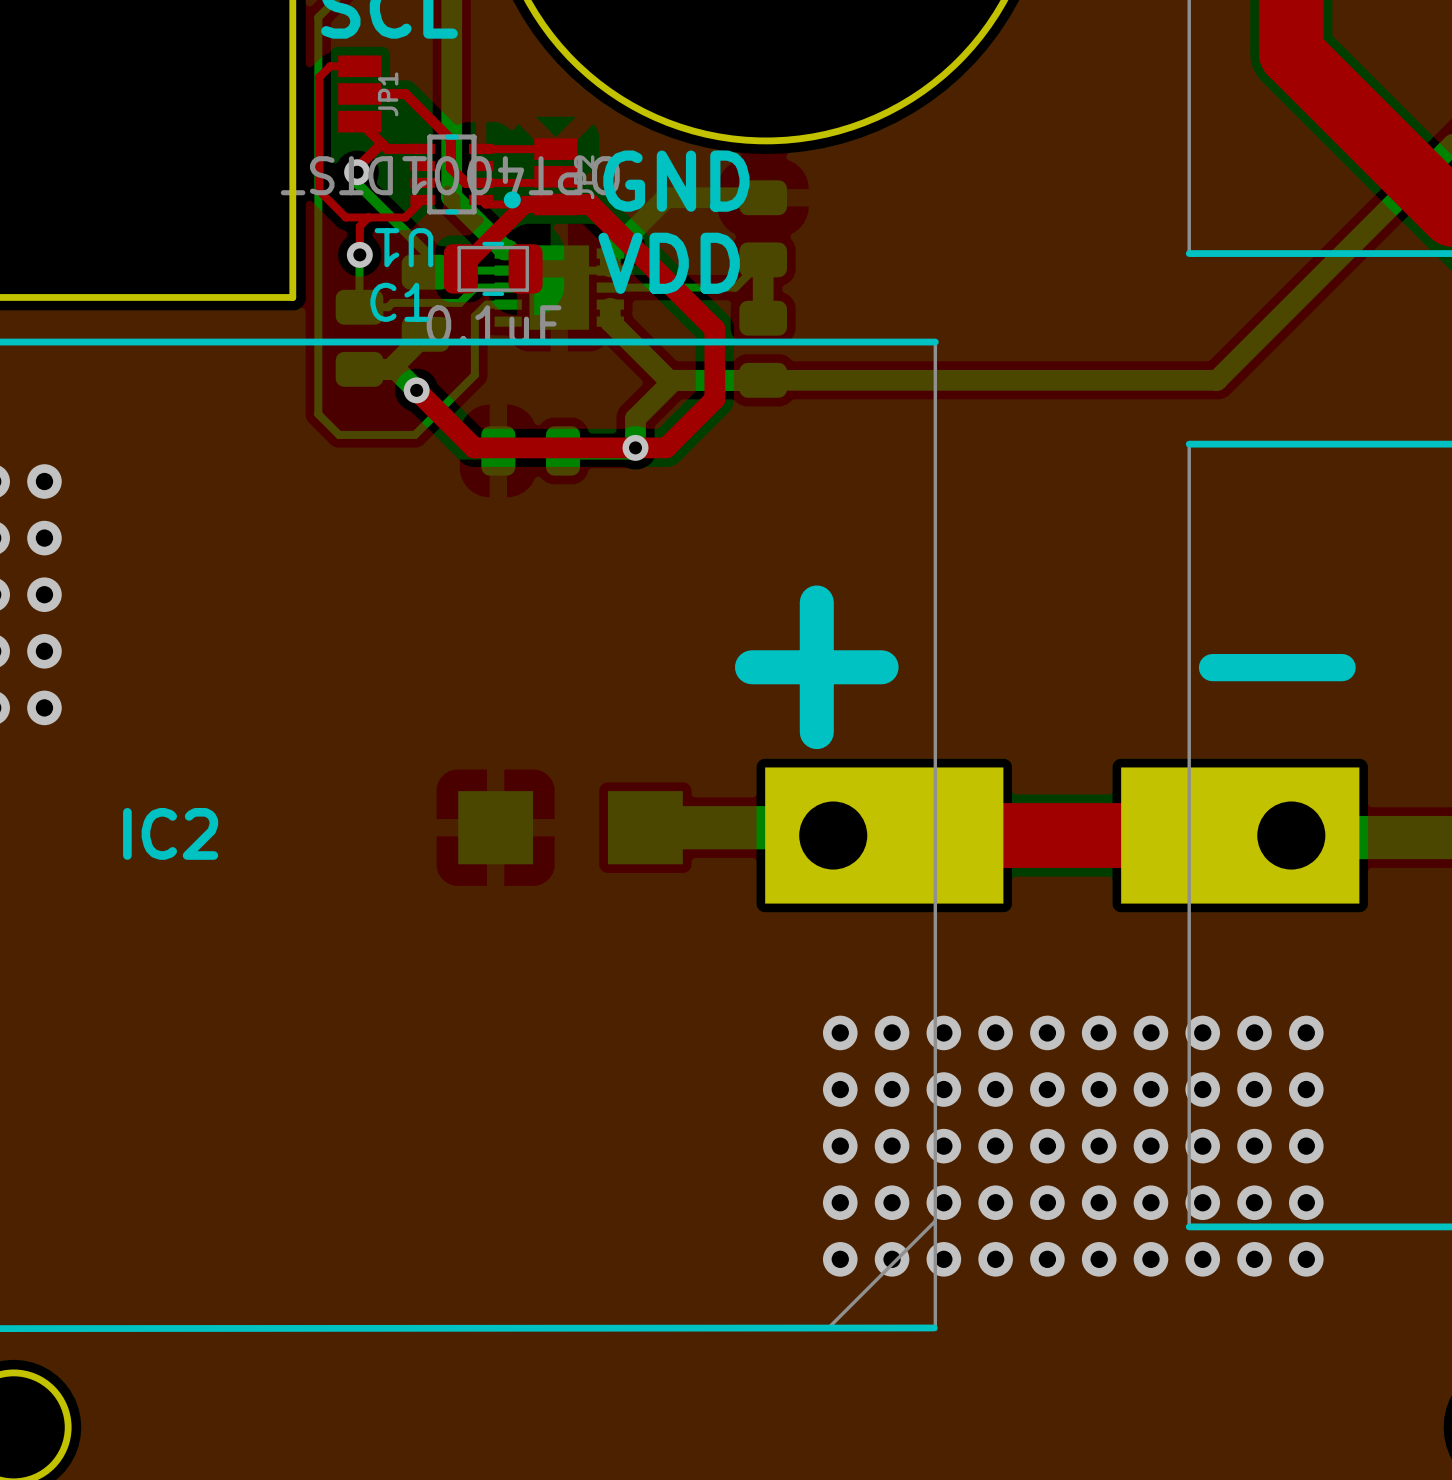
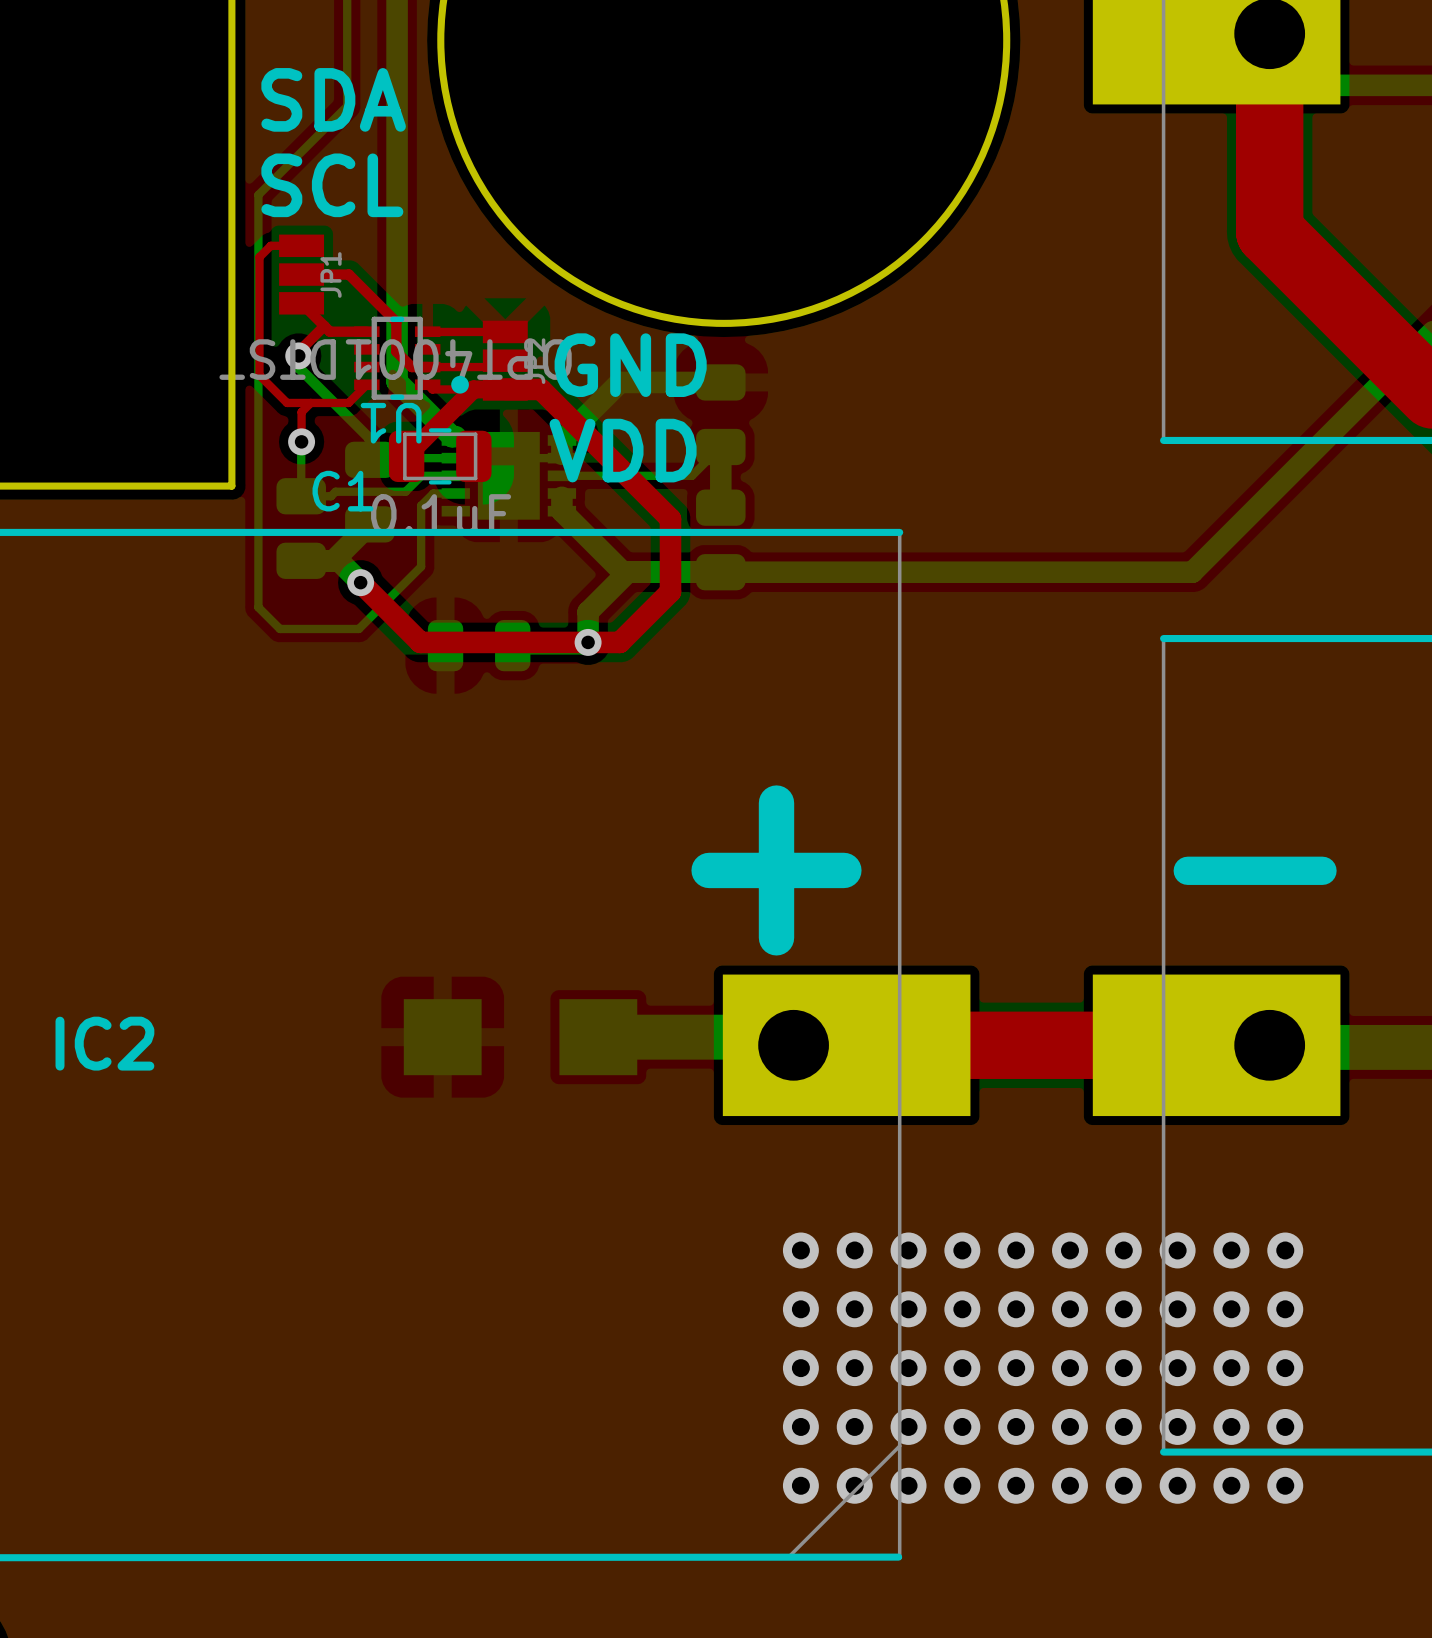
U1 name position: U1 (403, 247) -> U1 (391, 423)

